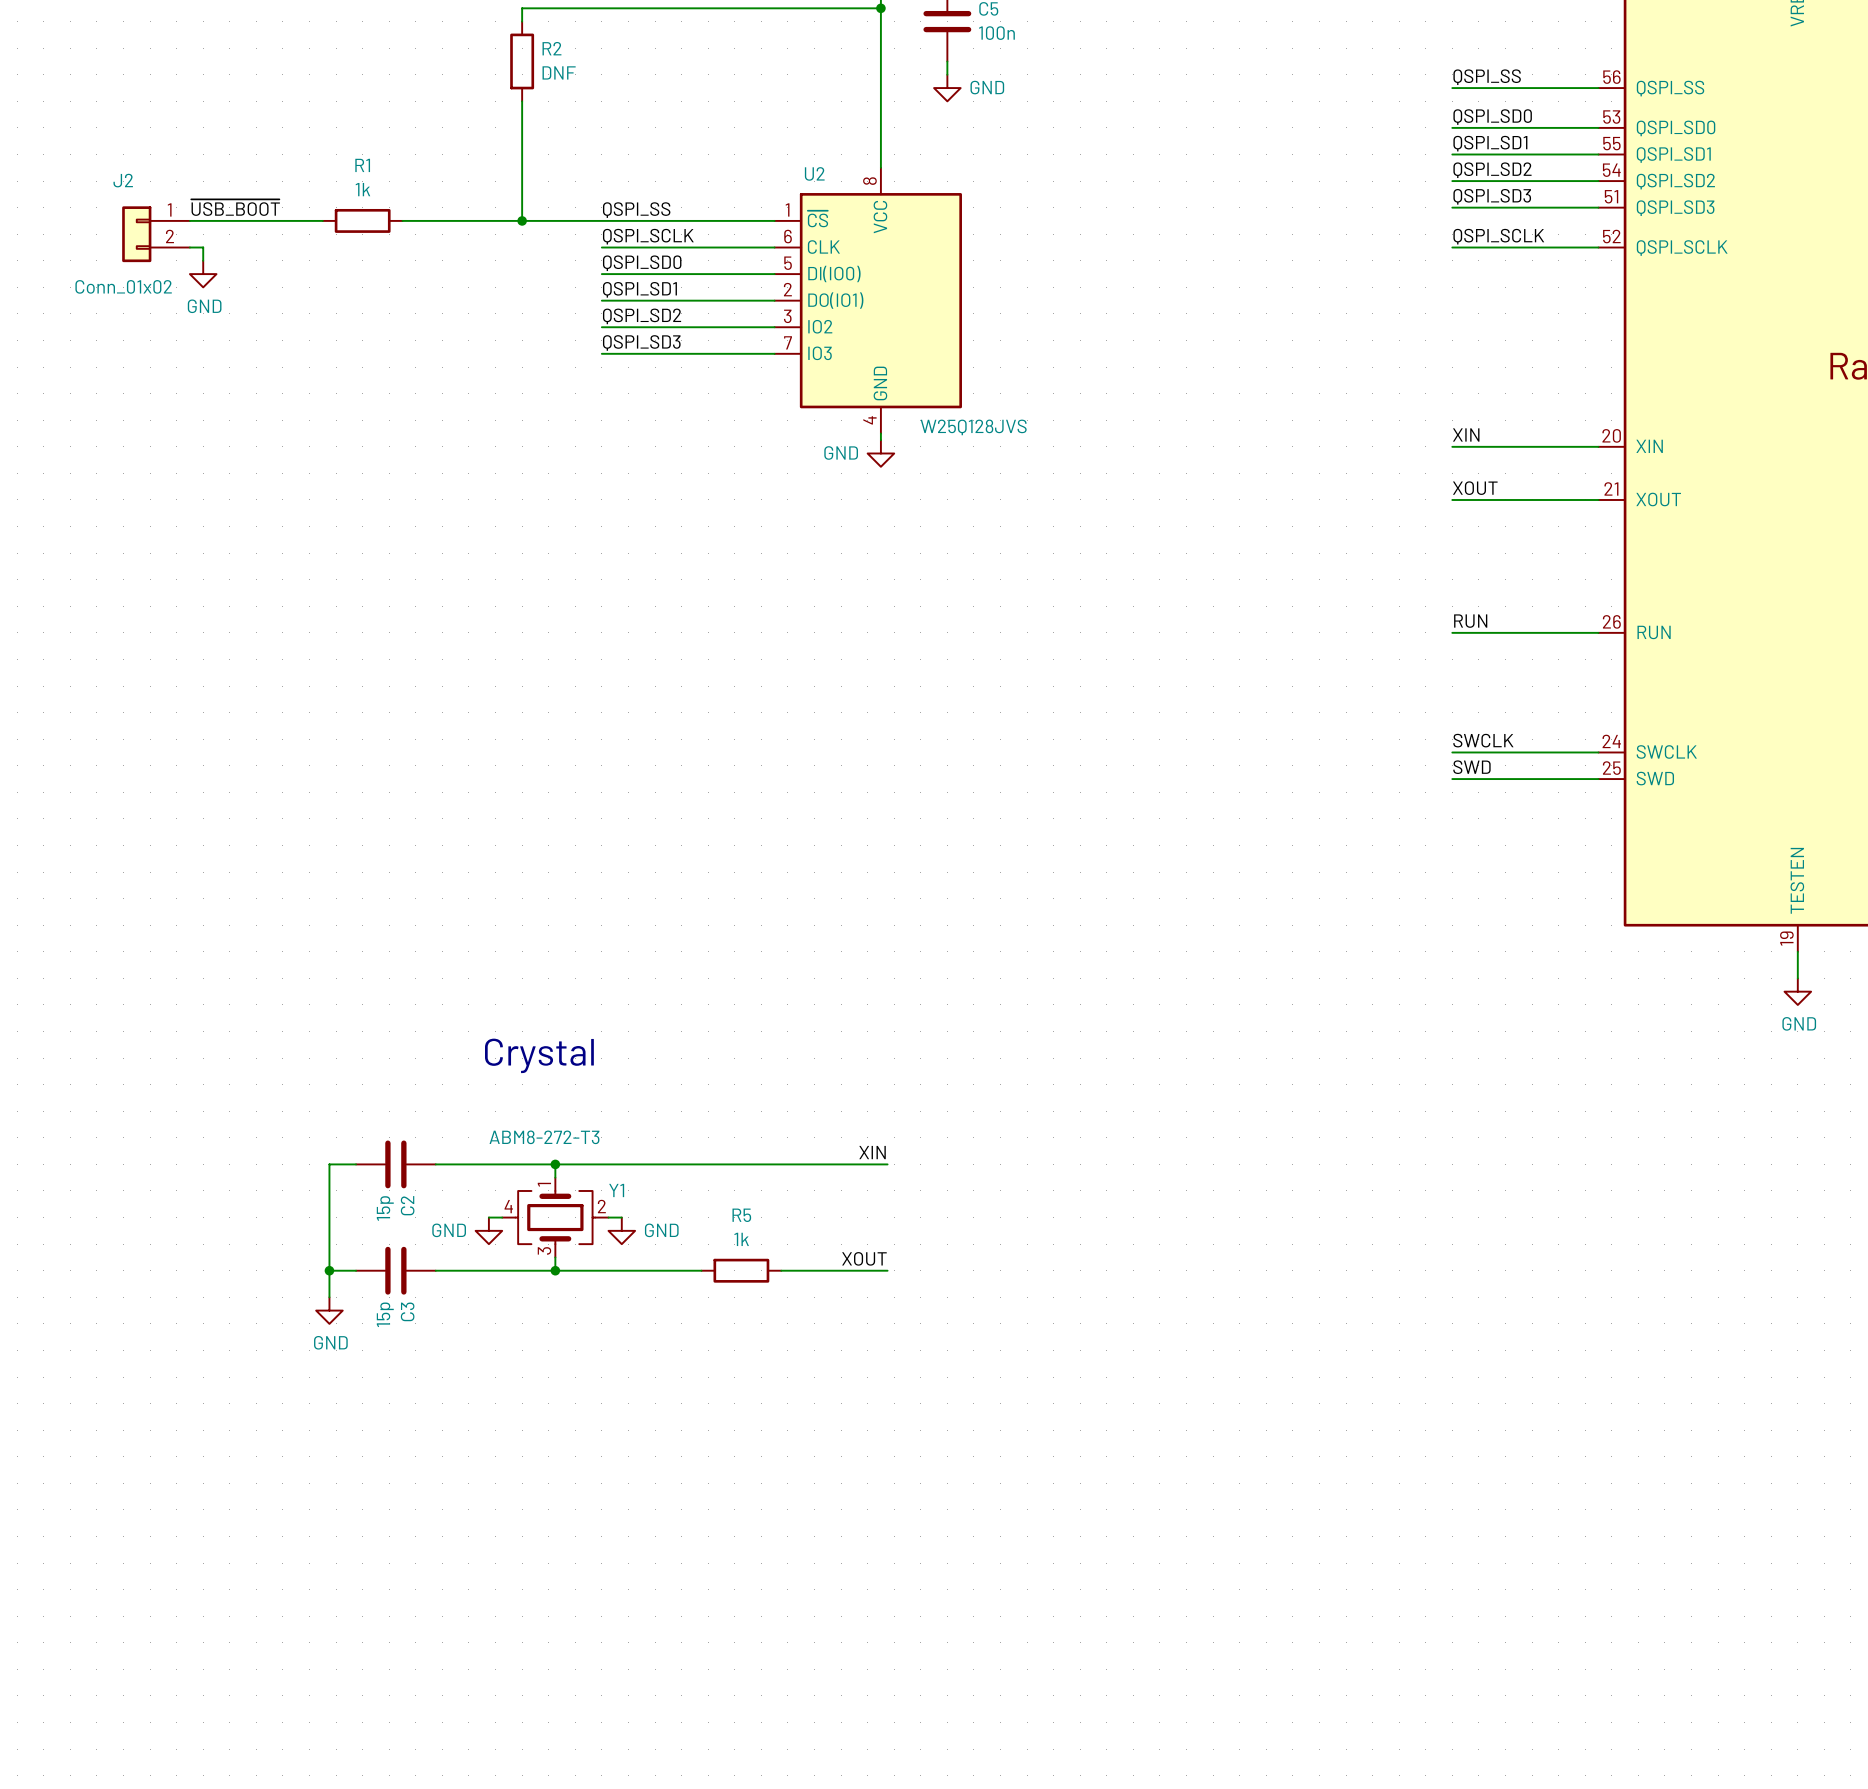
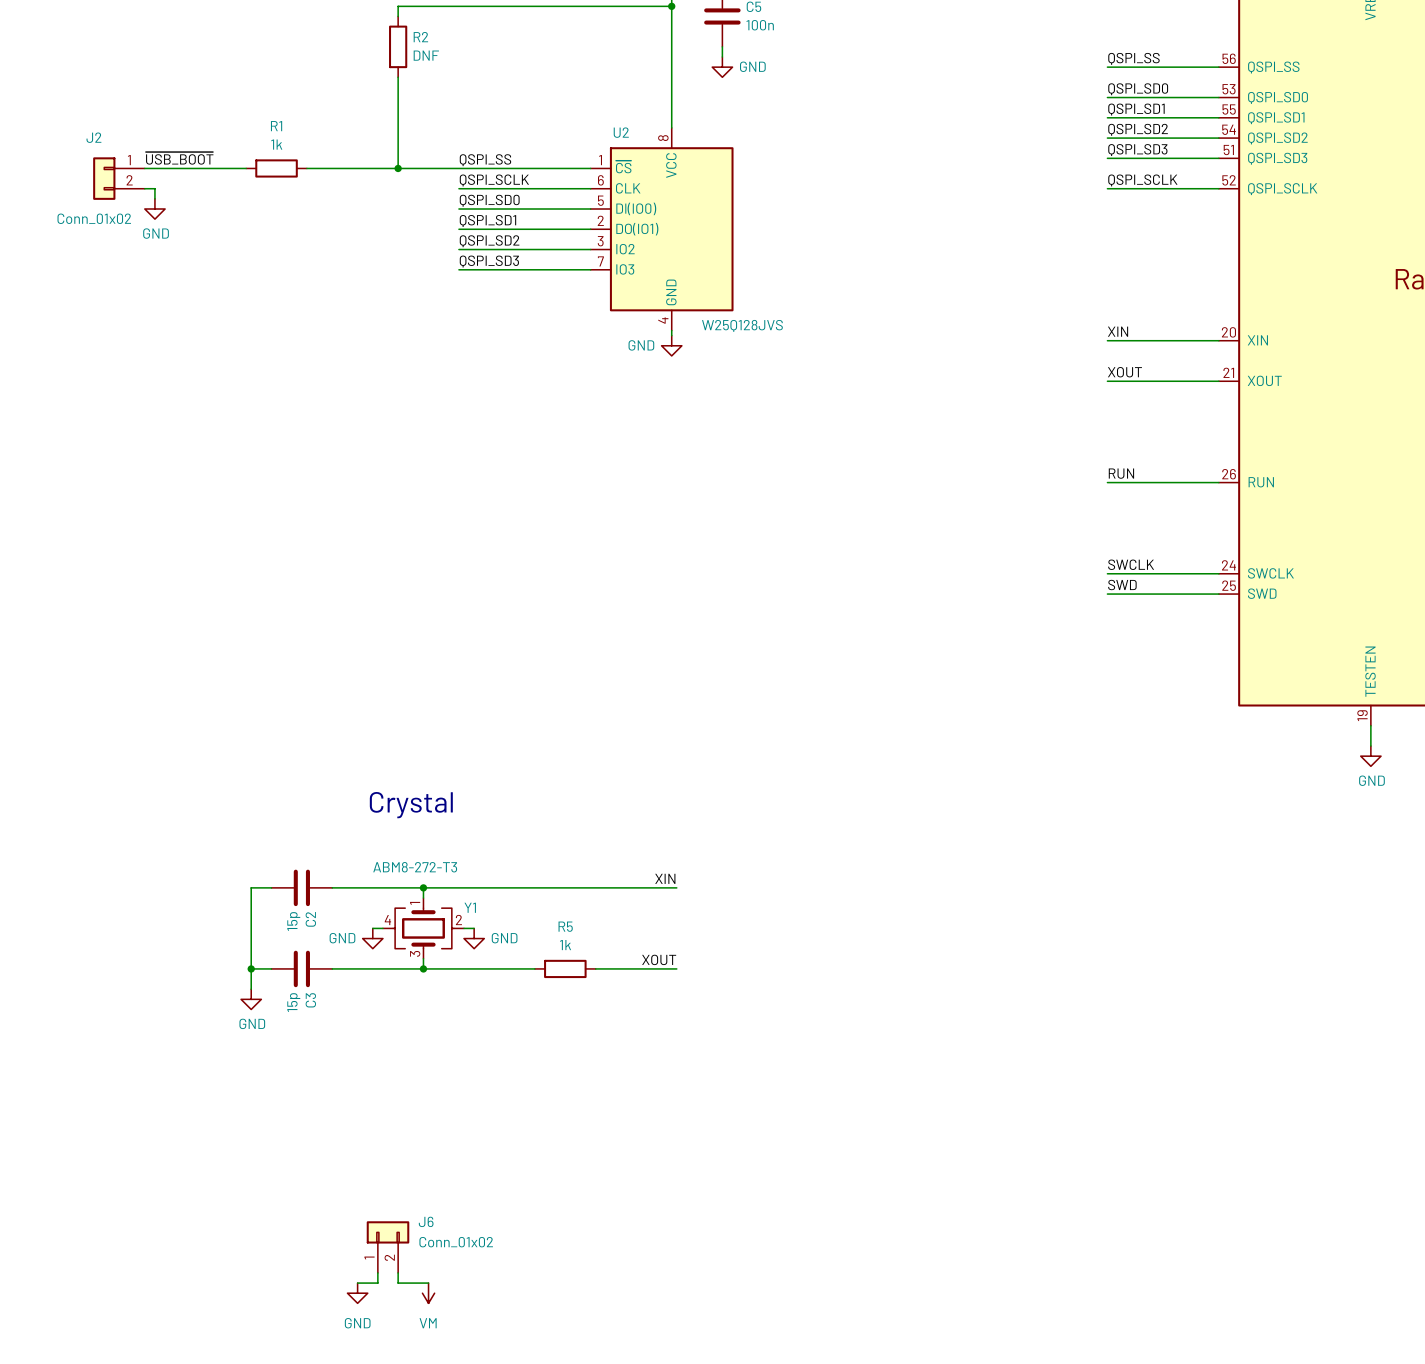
J6: none -> Conn_01x02 (388, 1247)
wire: none -> (377, 1272) (377, 1283) (357, 1283)
wire: none -> (398, 1272) (398, 1283) (428, 1283)
power symbol: none -> GND (357, 1293)
power symbol: none -> VM (428, 1293)

